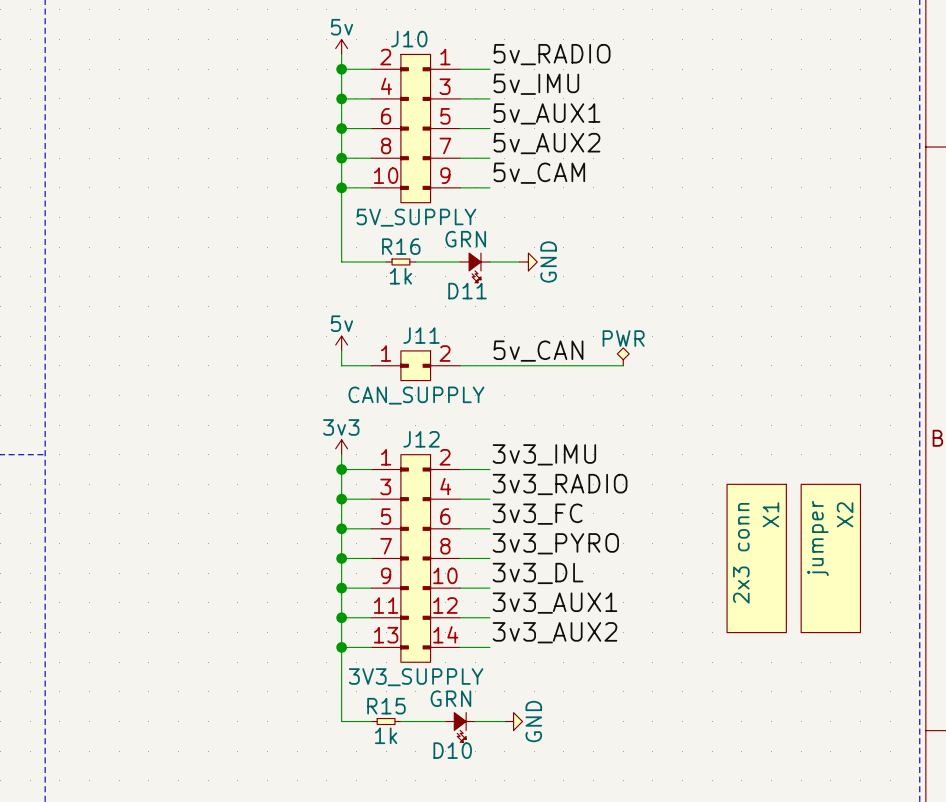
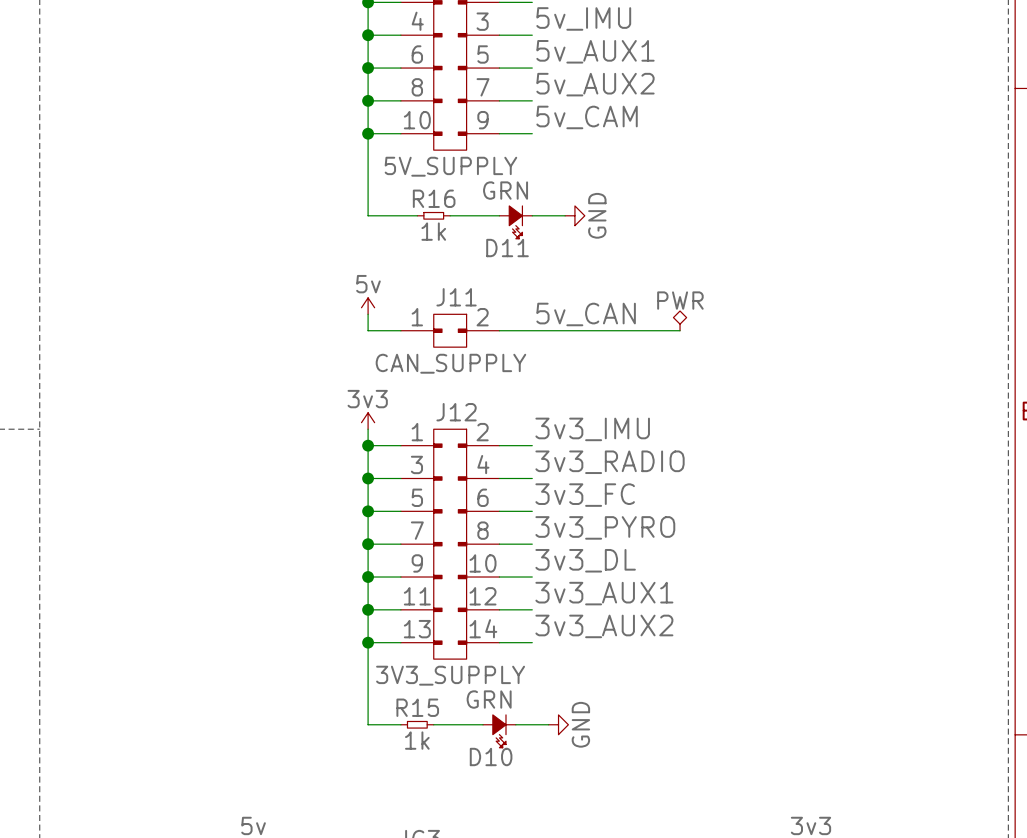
X1: 2x3 conn (756, 558) -> none
X2: jumper (830, 558) -> none

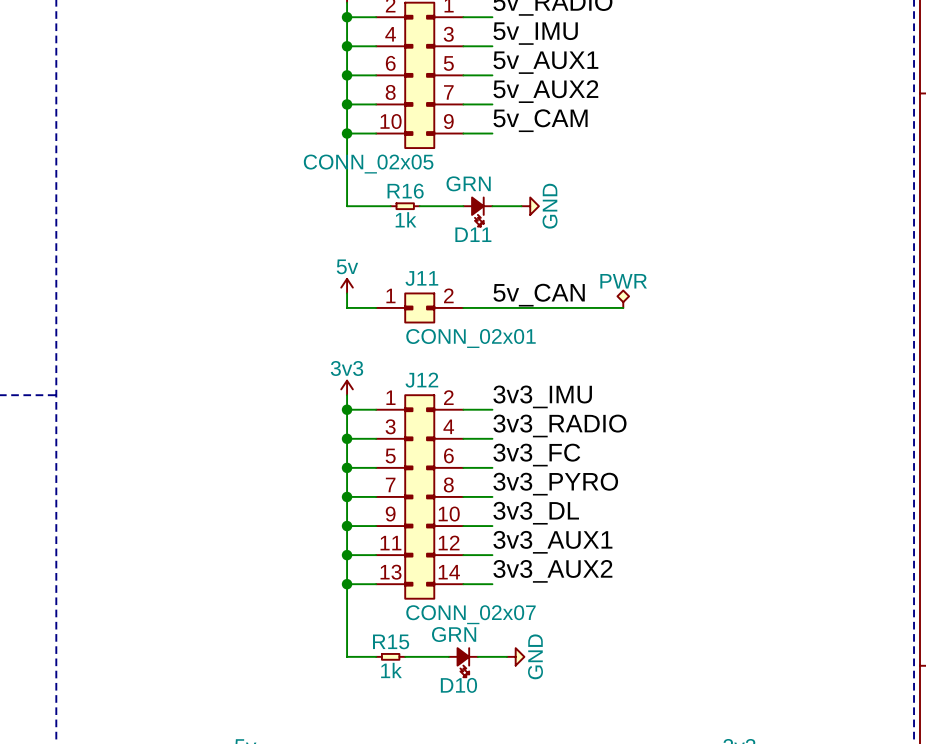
part value: 5V_SUPPLY (450, 166) -> CONN_02x05 (368, 164)
J11 value: CAN_SUPPLY (450, 363) -> CONN_02x01 (470, 338)
J12 value: 3V3_SUPPLY (450, 675) -> CONN_02x07 (470, 614)

